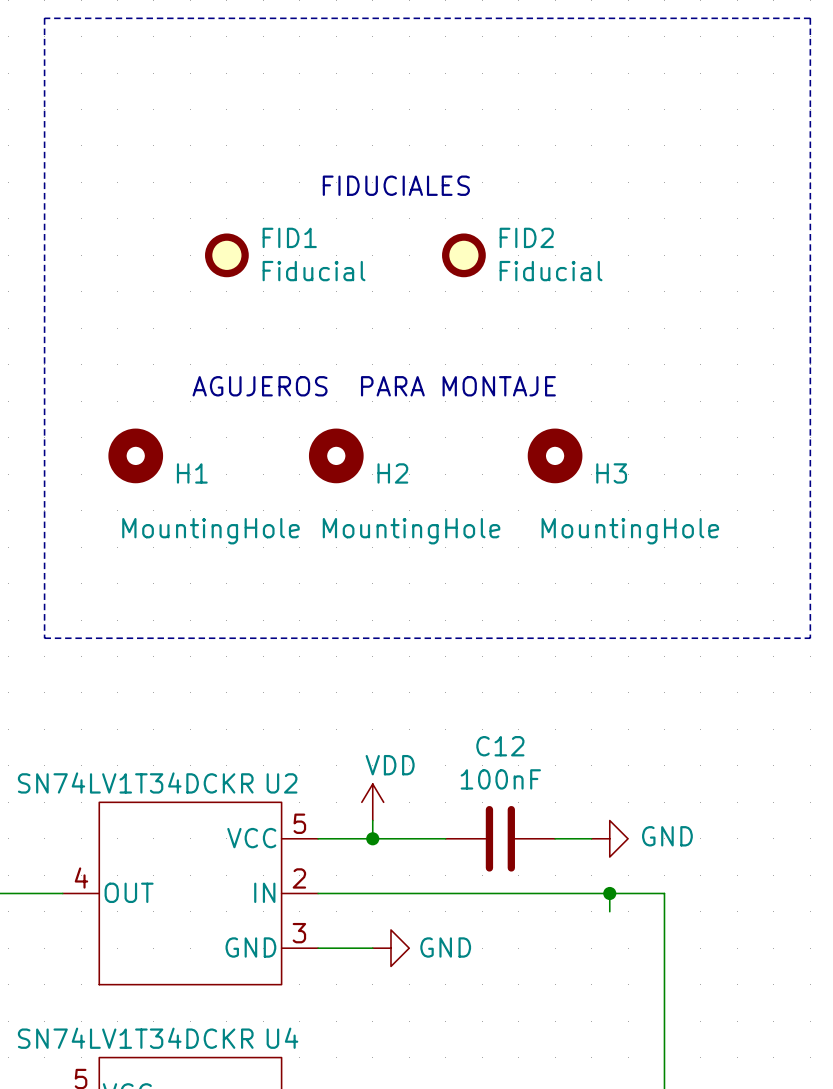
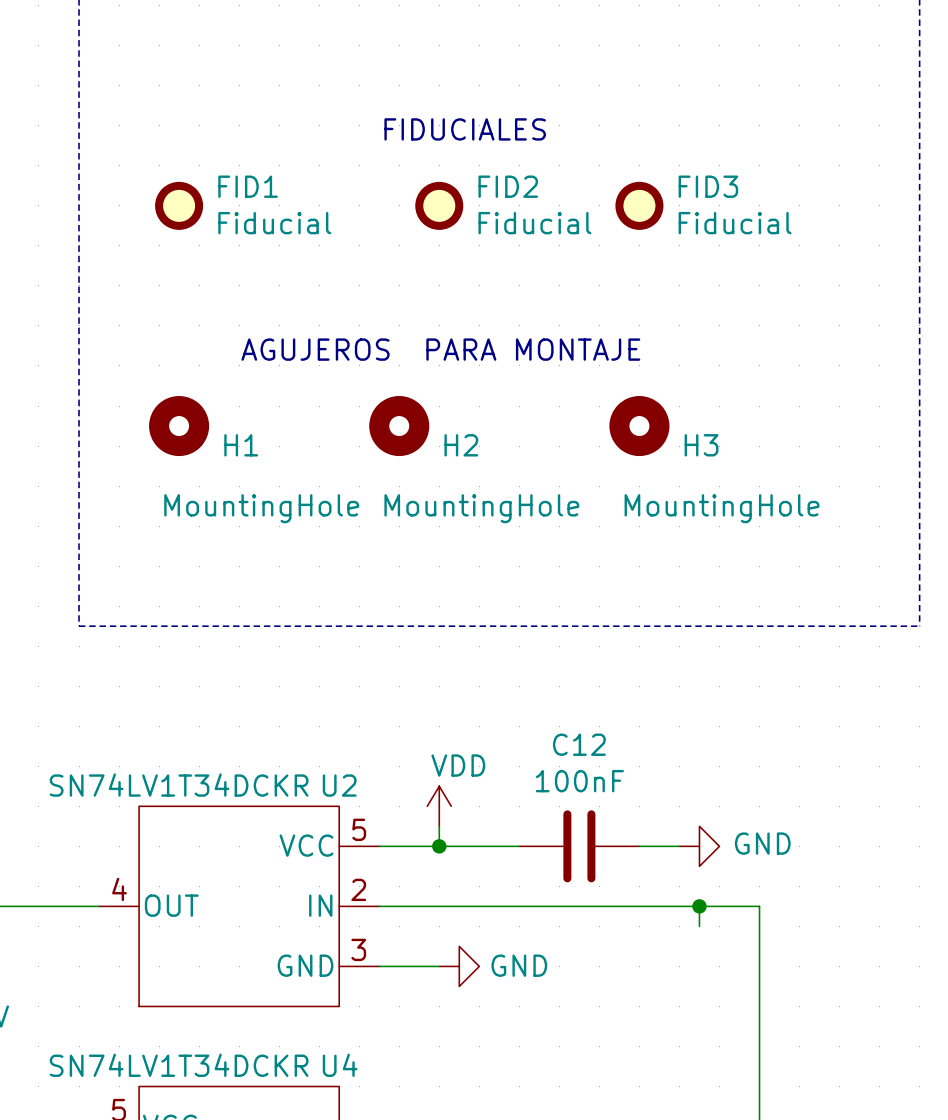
FID1 position: (226, 255) -> (179, 205)
FID2 position: (463, 255) -> (439, 205)
FID3: none -> Fiducial (639, 205)

